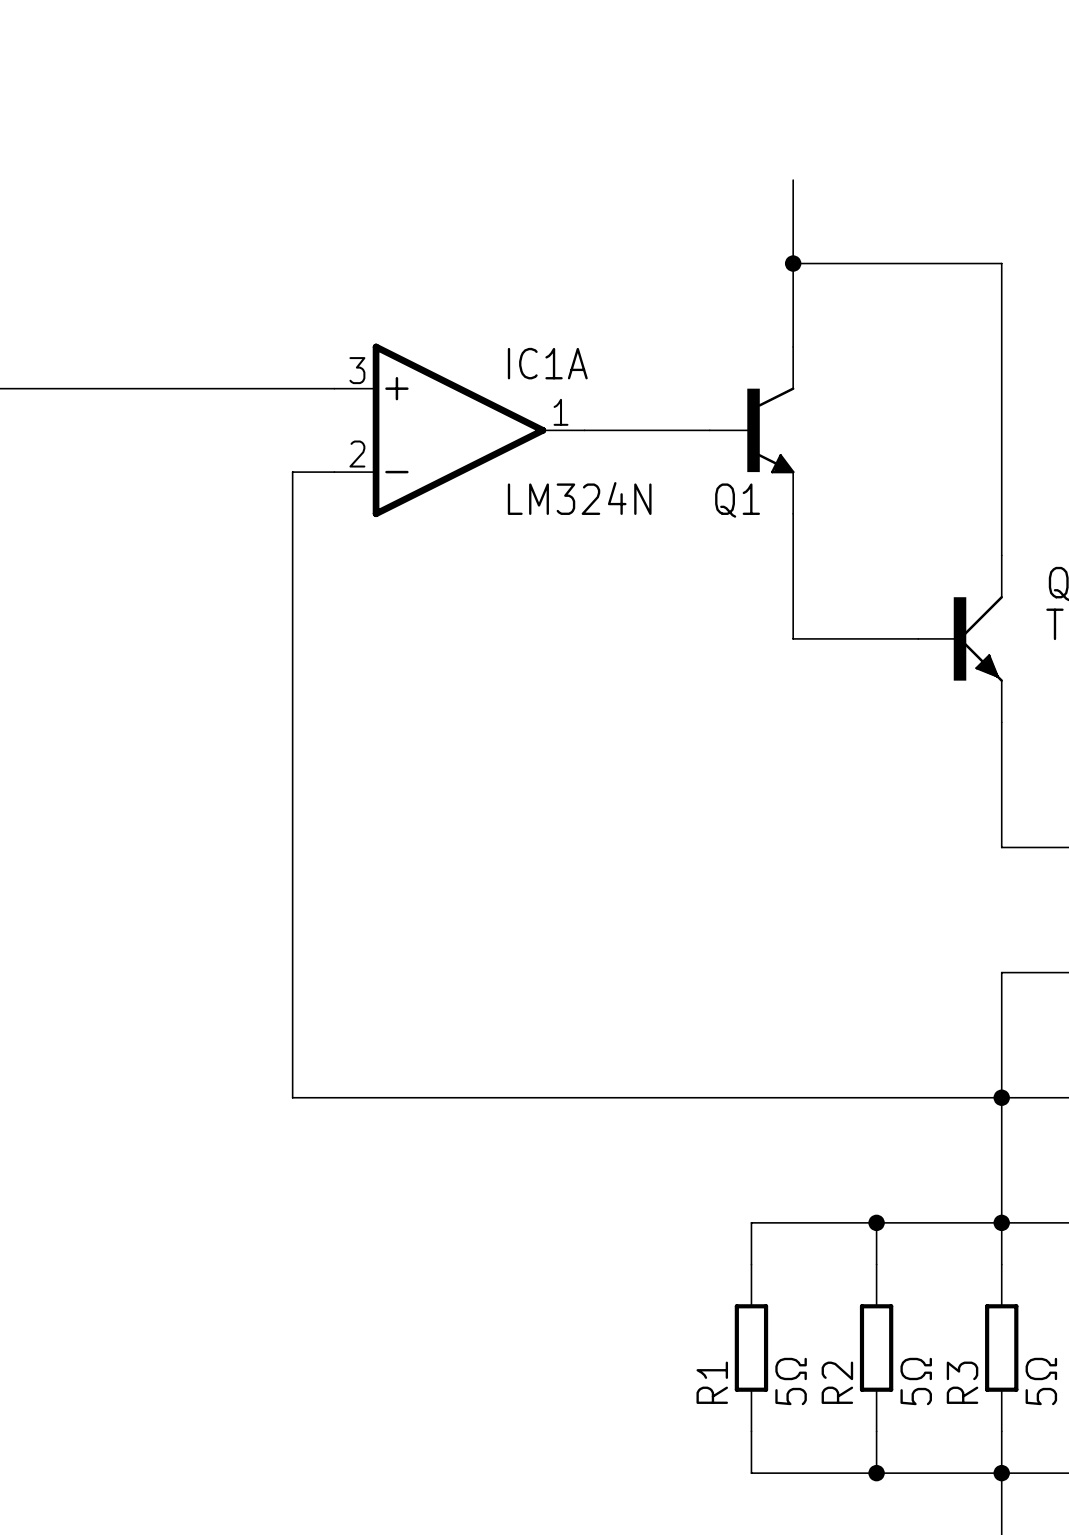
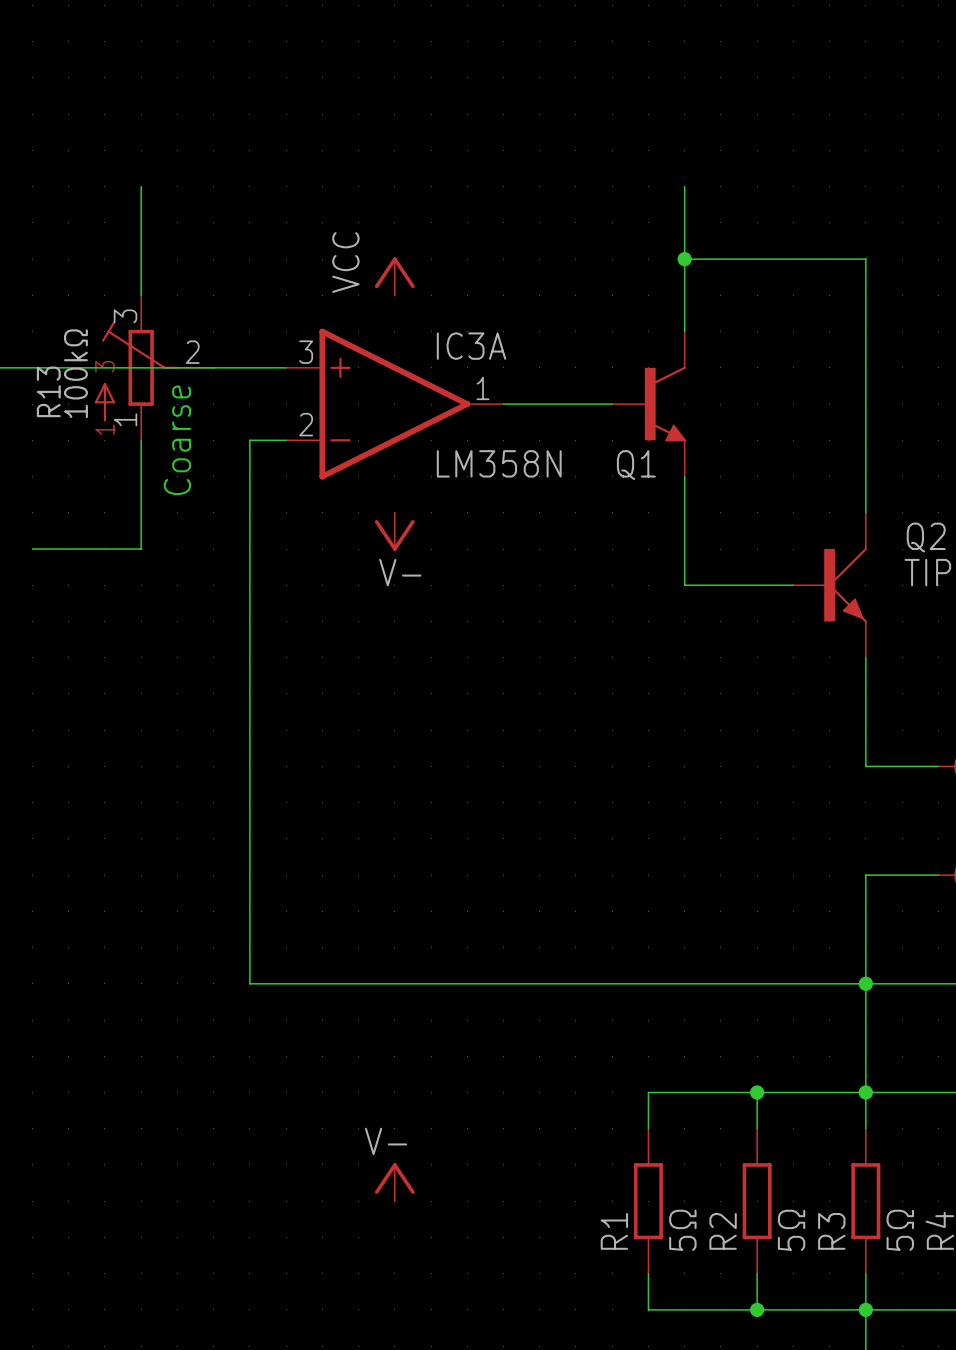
wire: none -> (141, 186) (141, 295)
power symbol: none -> VCC (394, 276)
IC1A name: IC1A (547, 363) -> IC3A (471, 346)
R13: none -> 100kΩ (154, 367)
wire: none -> (141, 440) (141, 549) (32, 549)
text: none -> Coarse (177, 440)
IC1A value: LM324N (579, 498) -> LM358N (499, 463)
power symbol: none -> V- (394, 531)
power symbol: none -> V- (394, 1182)

